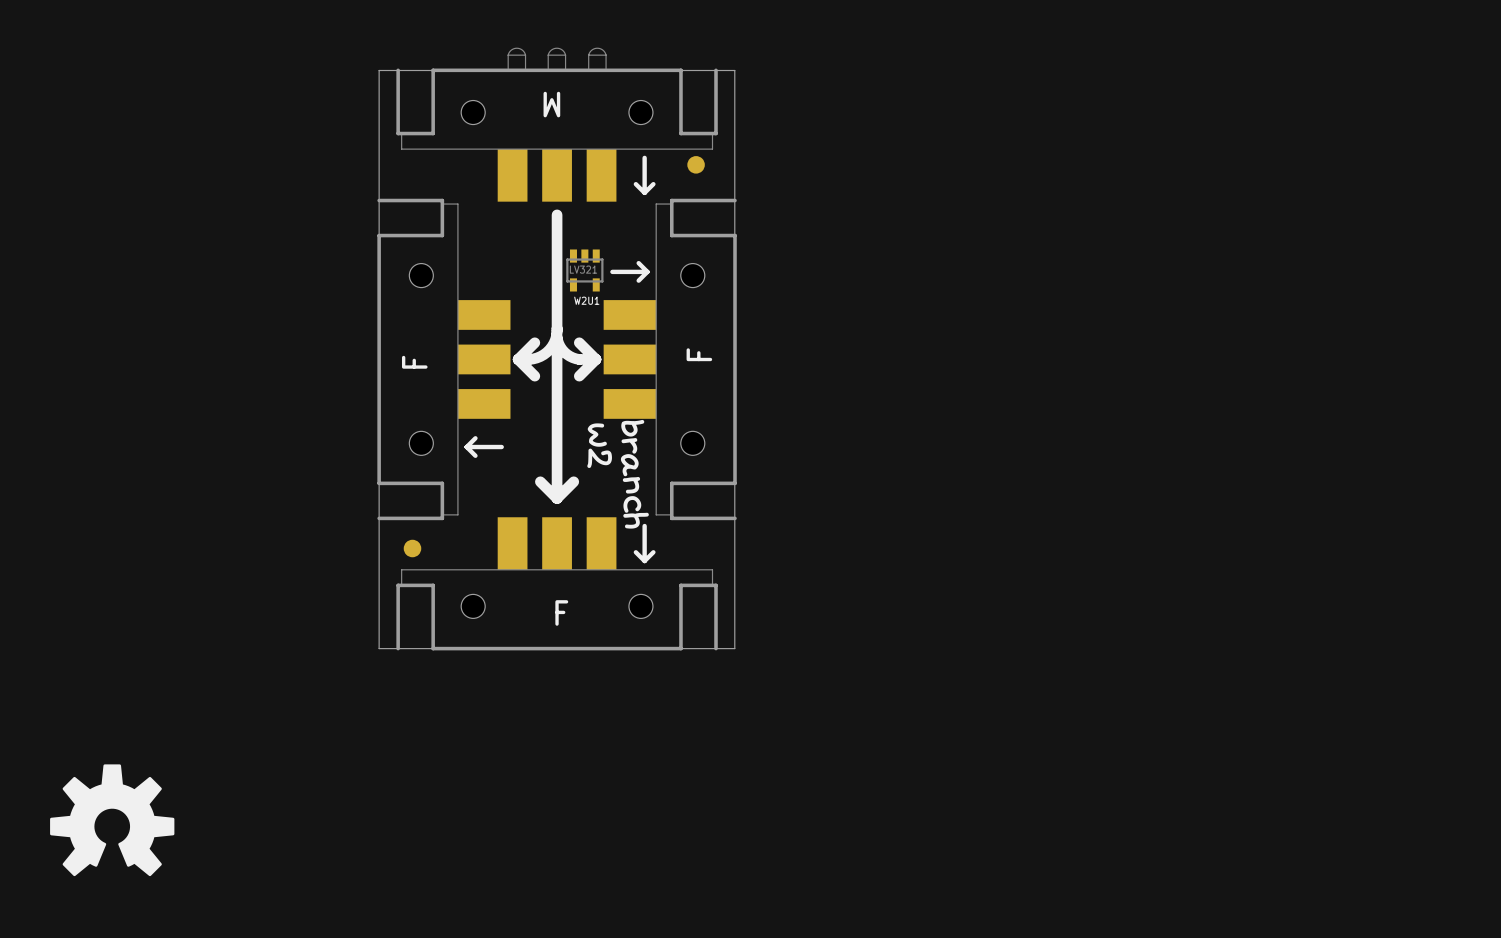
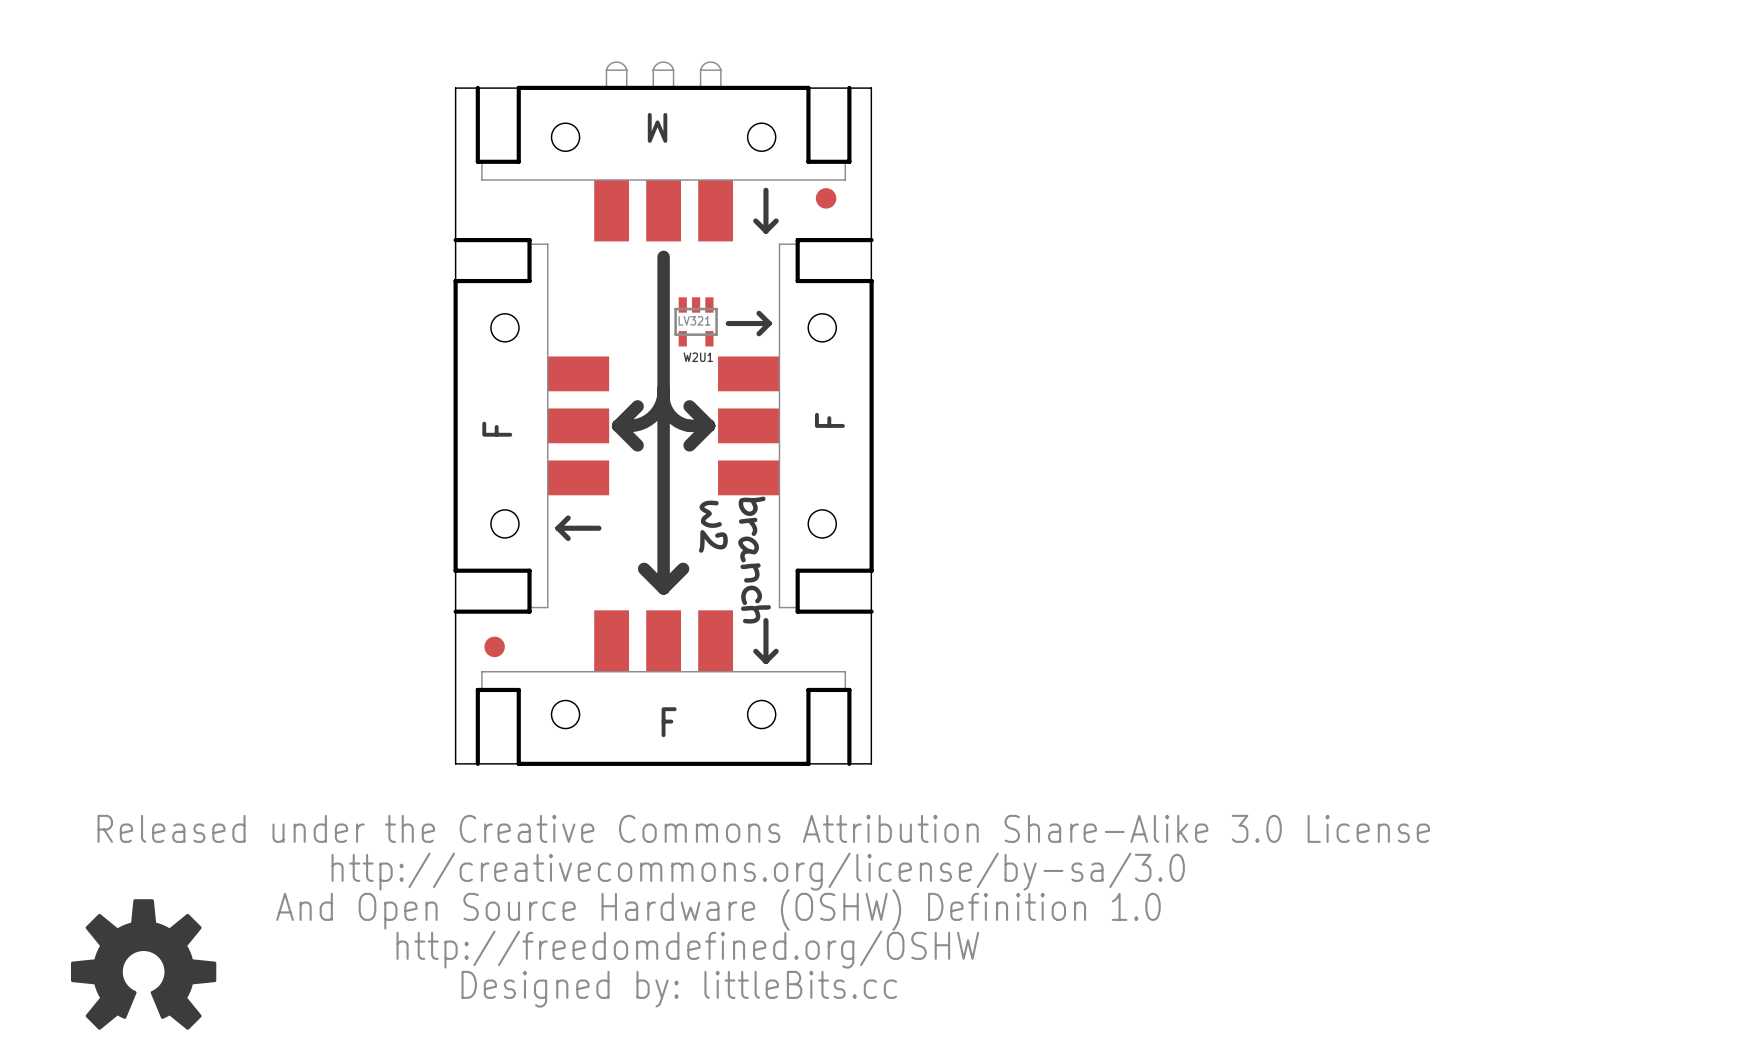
drawing: none -> [97, 814, 1431, 1008]

